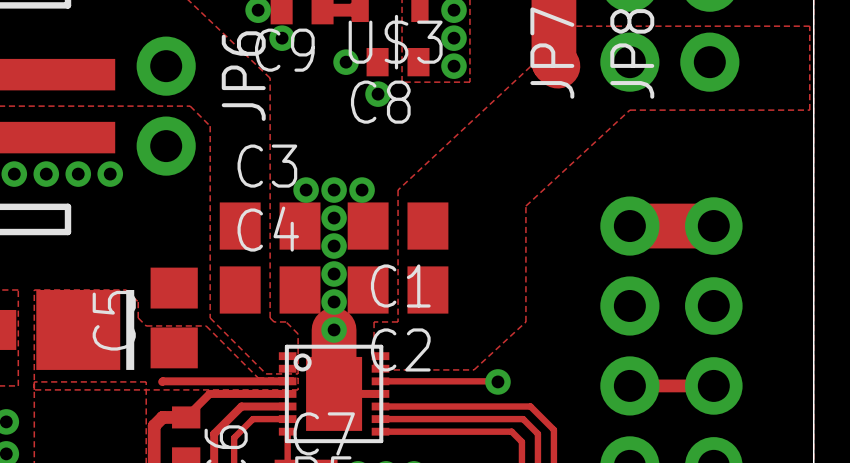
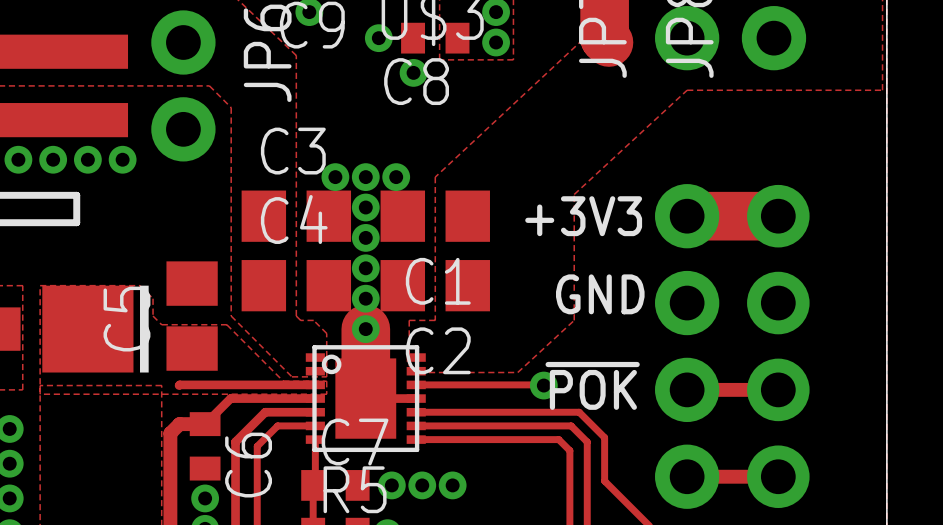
text: none -> +3V3 (583, 216)
text: none -> GND (600, 294)
text: none -> ~{POK} (592, 385)

